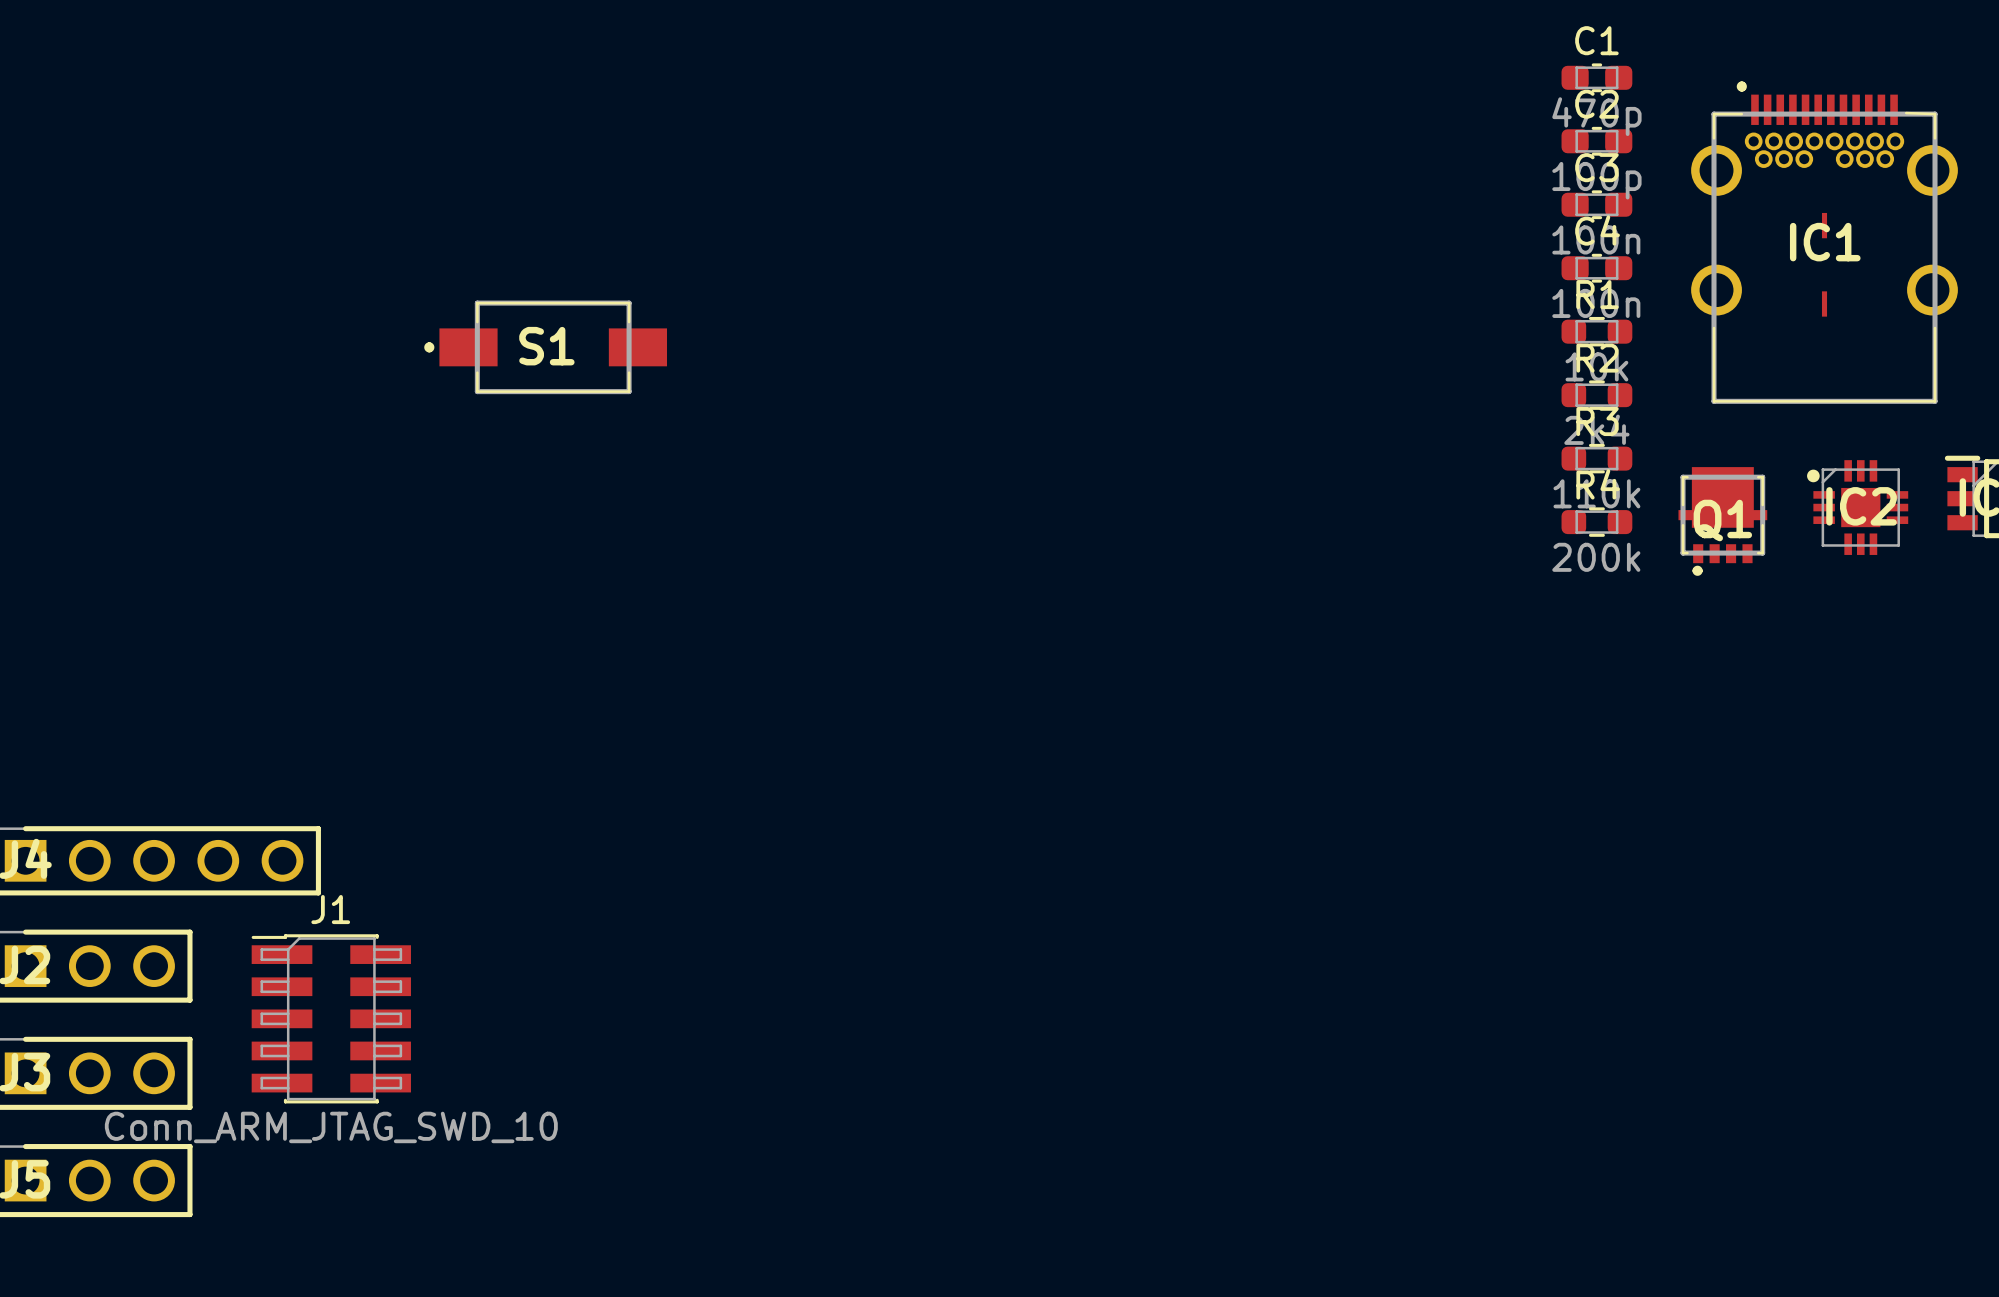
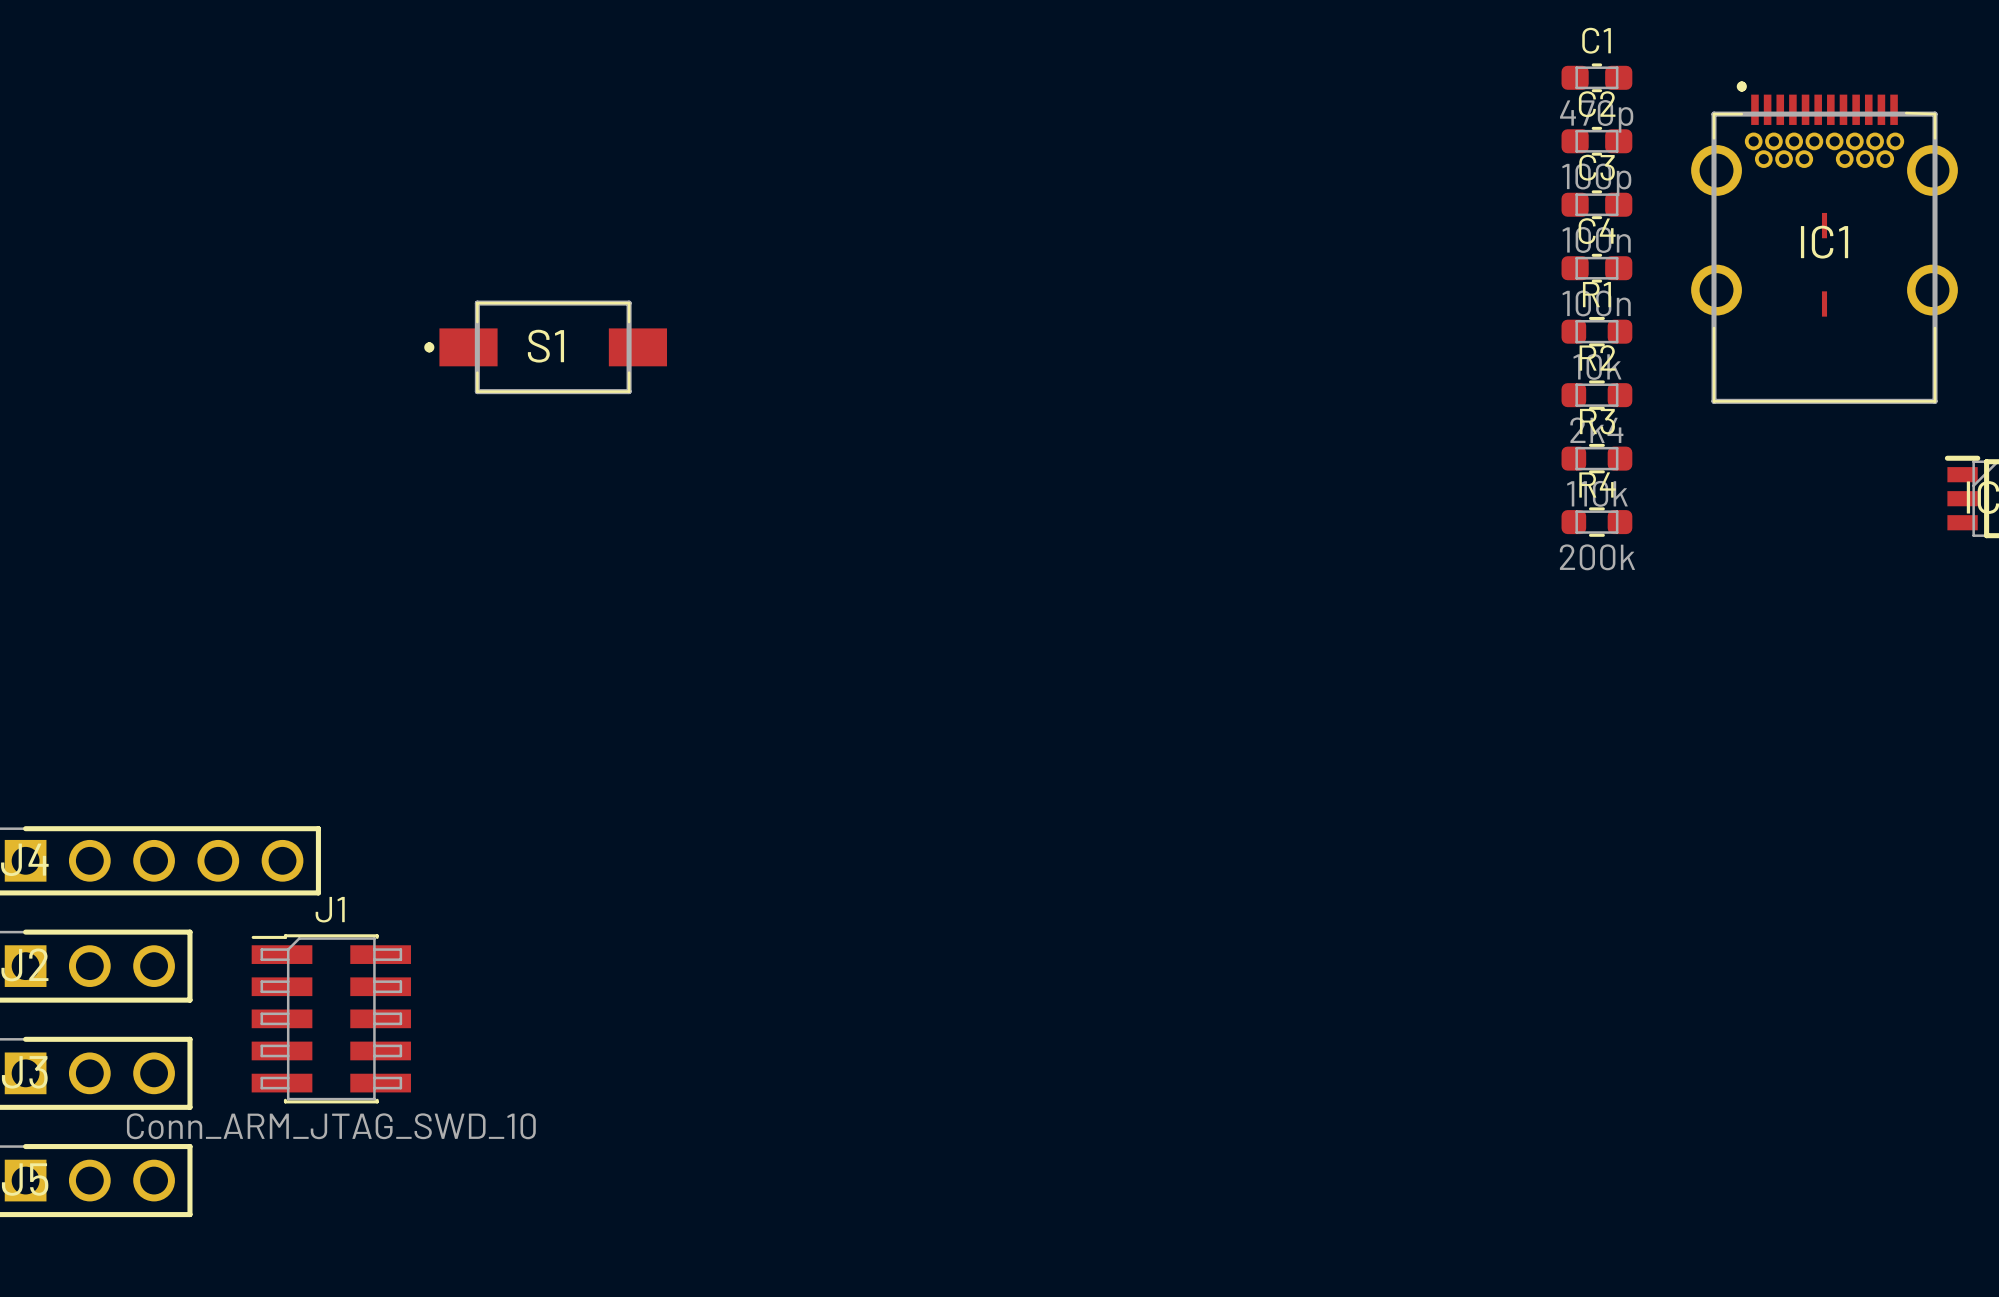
IC2: (1857, 507) -> none
Q1: (1722, 521) -> none

